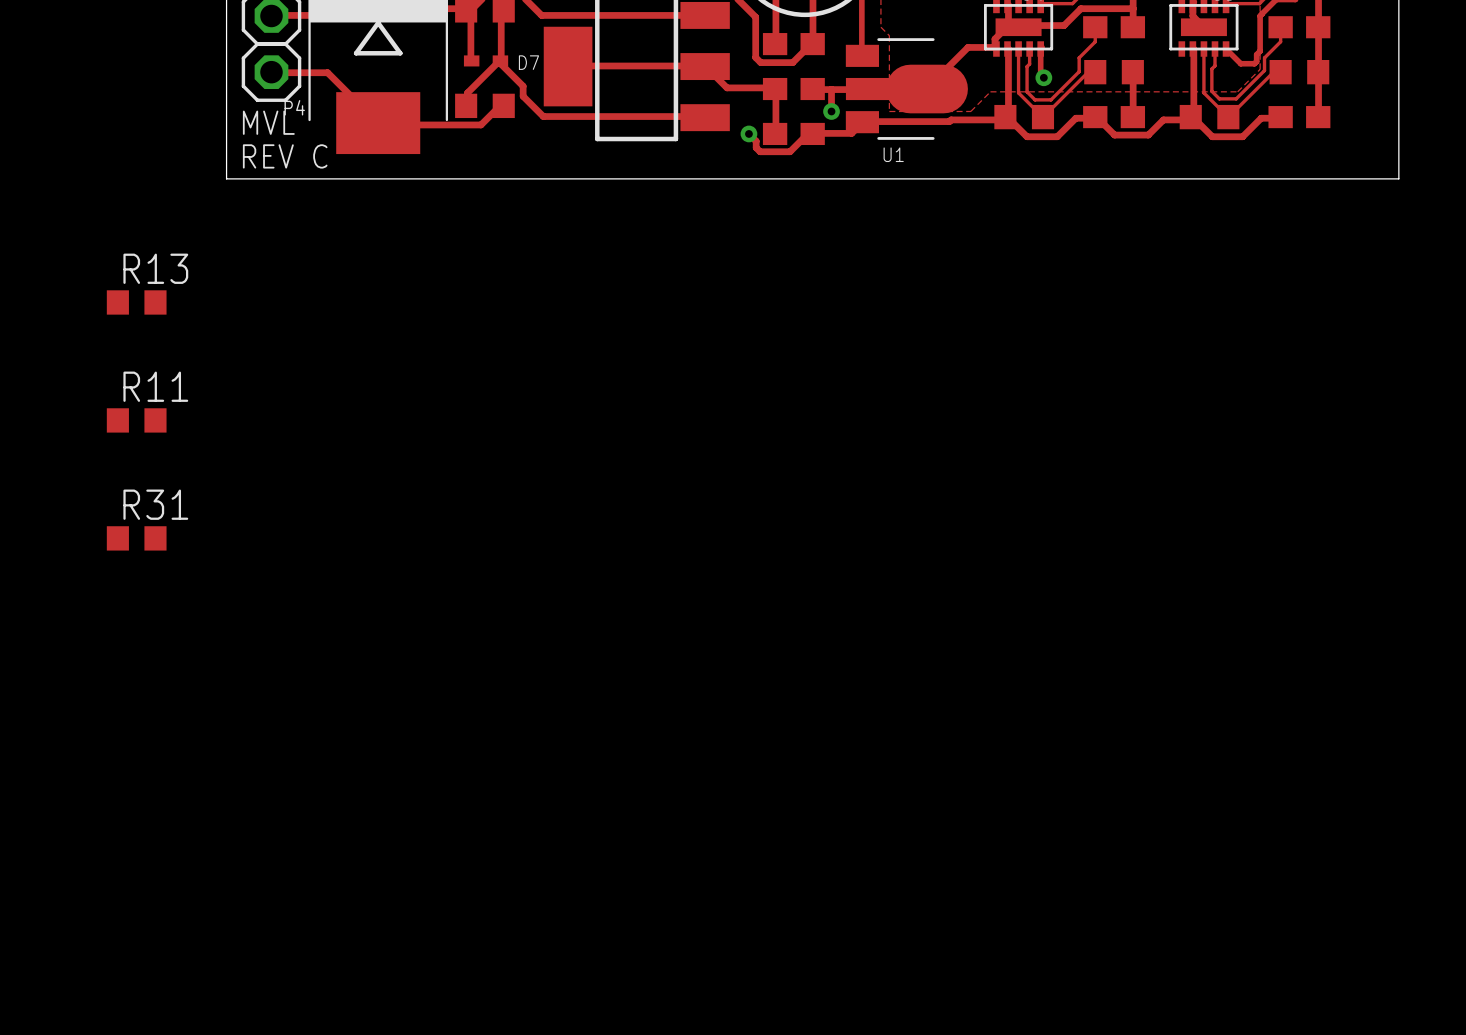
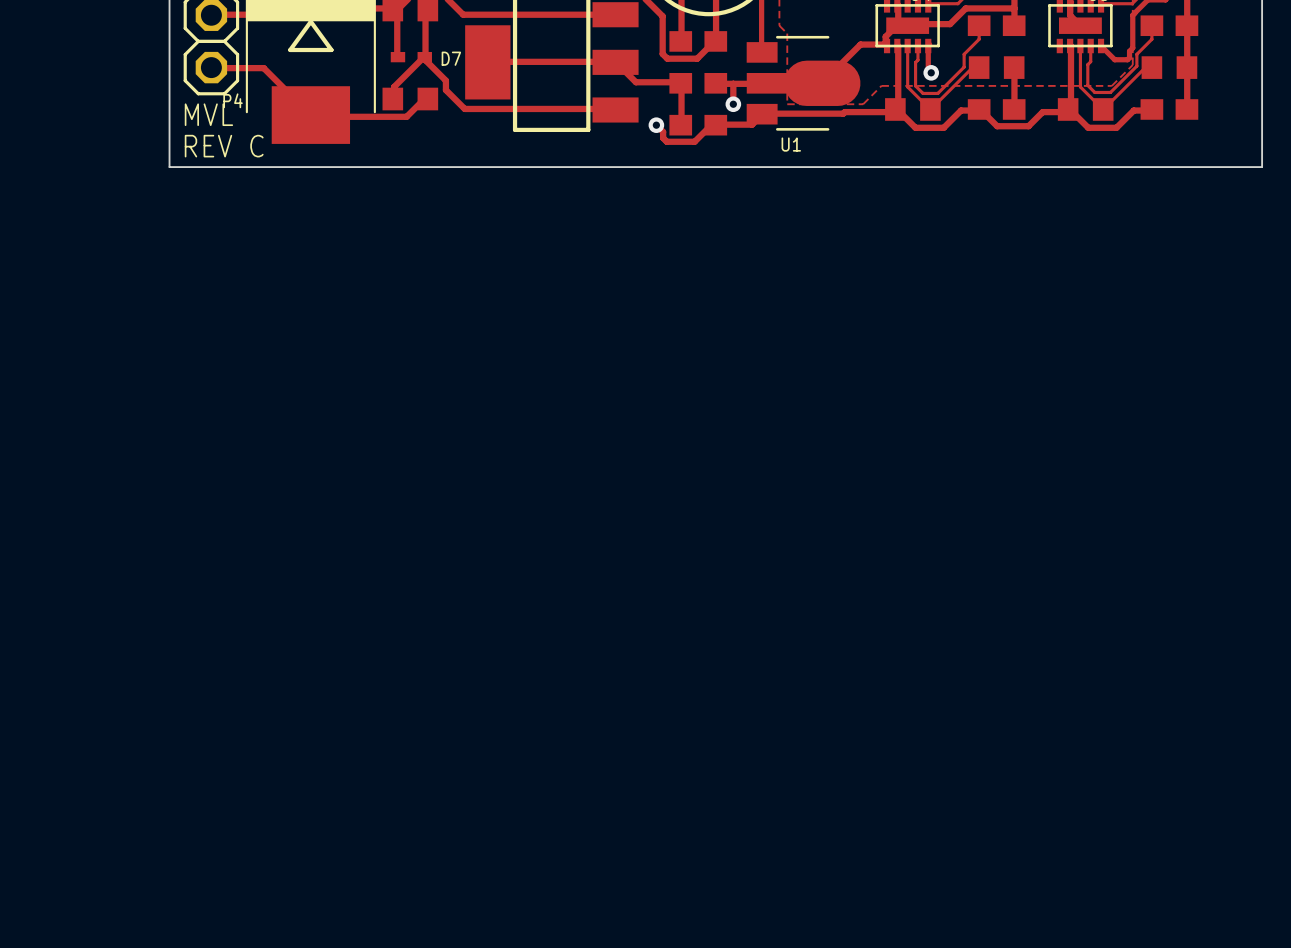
R13: (136, 302) -> none
R11: (136, 420) -> none
R31: (136, 538) -> none

